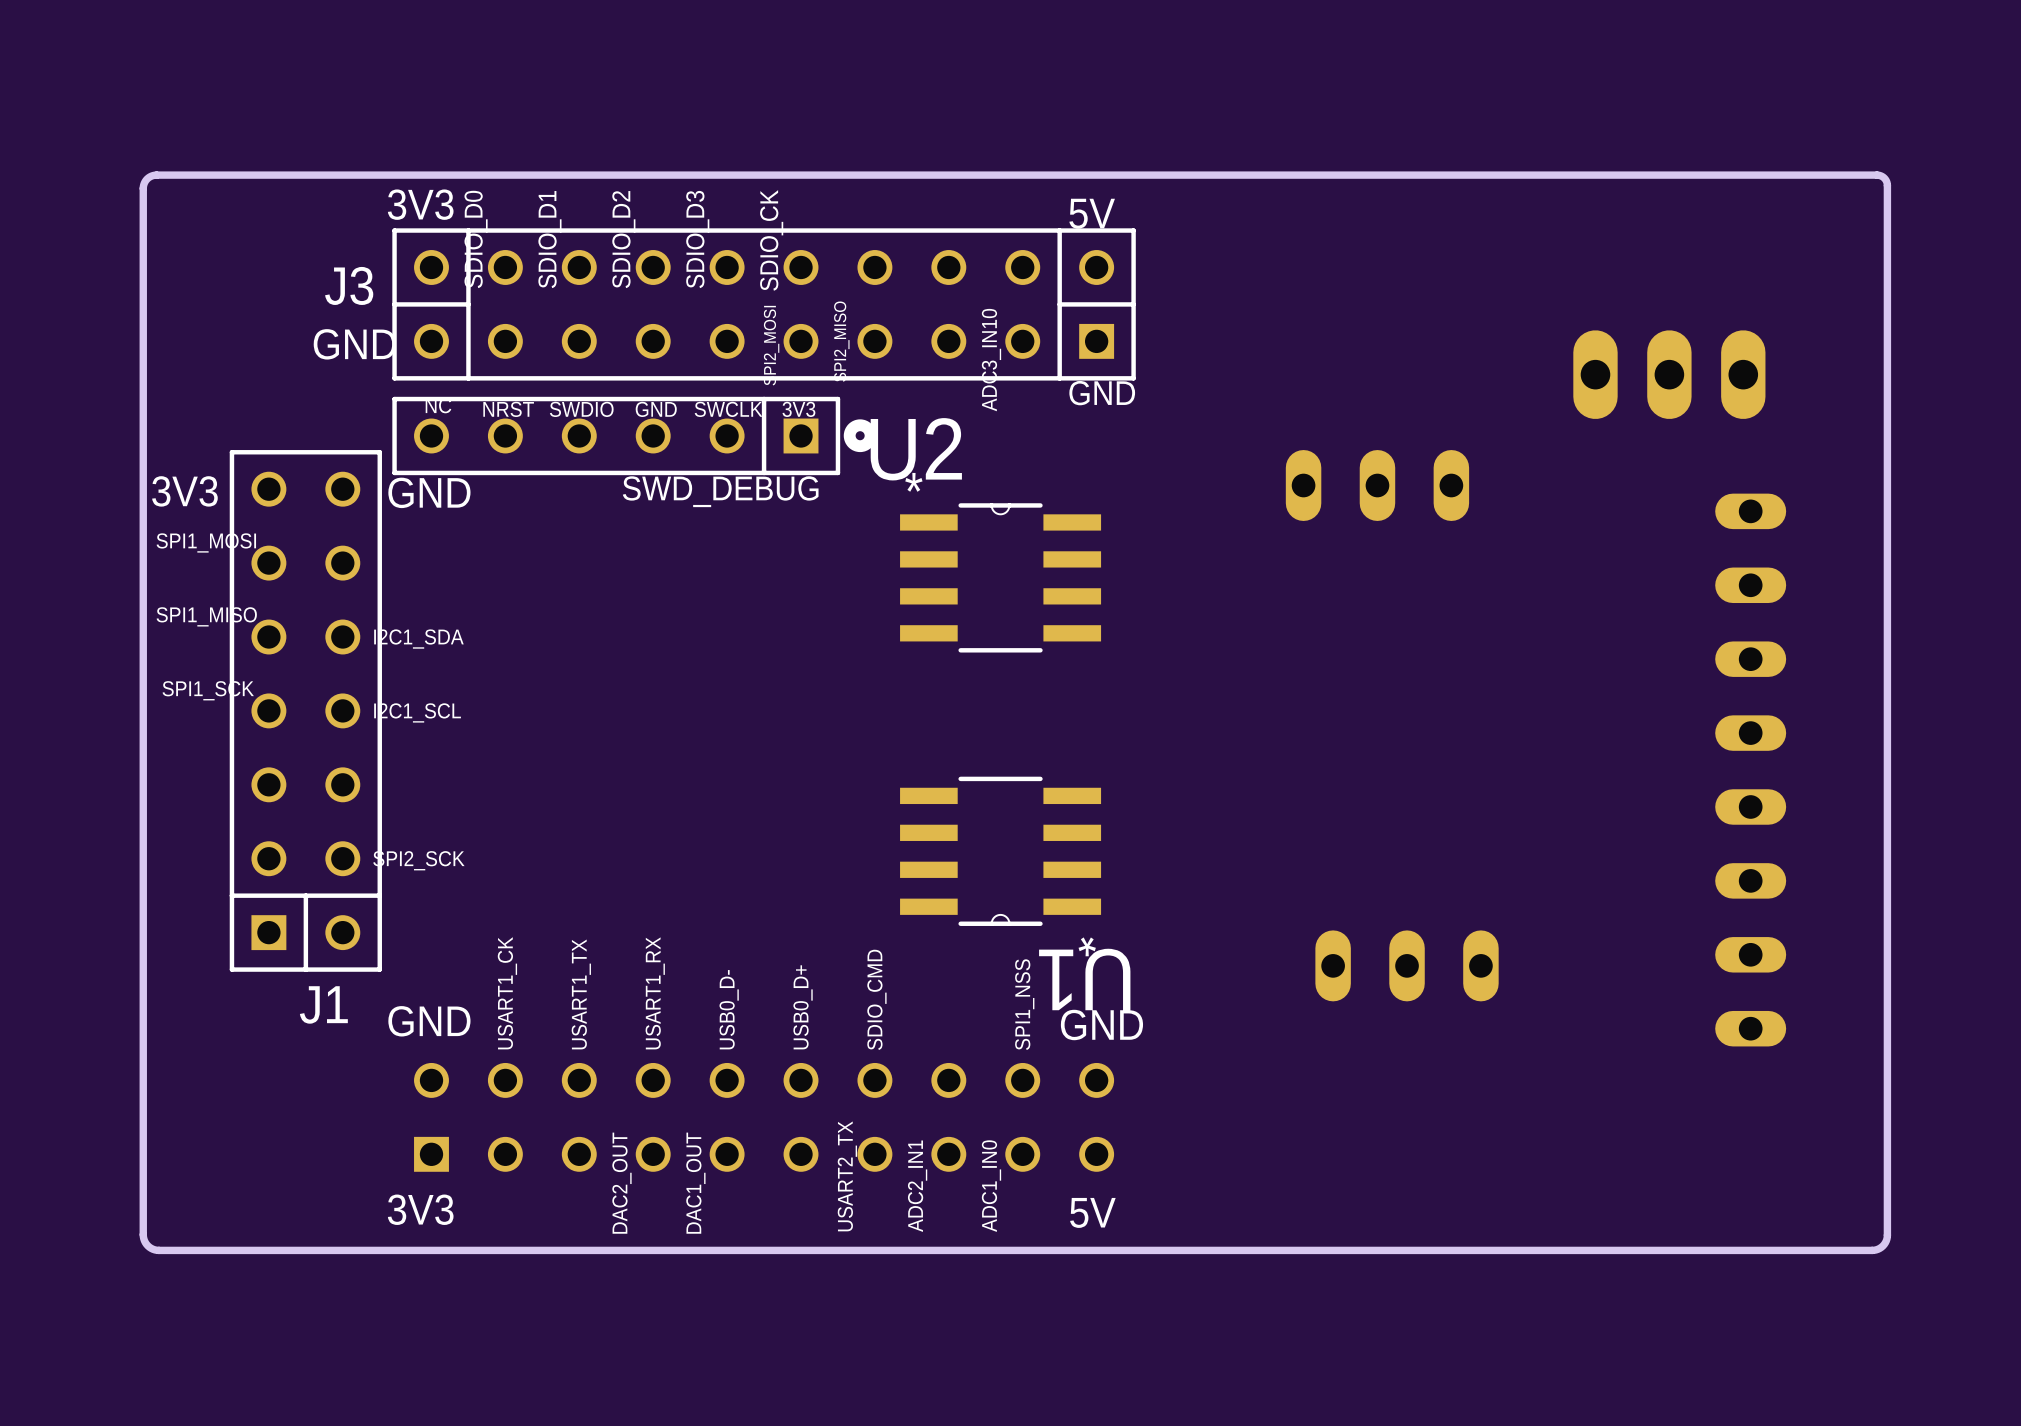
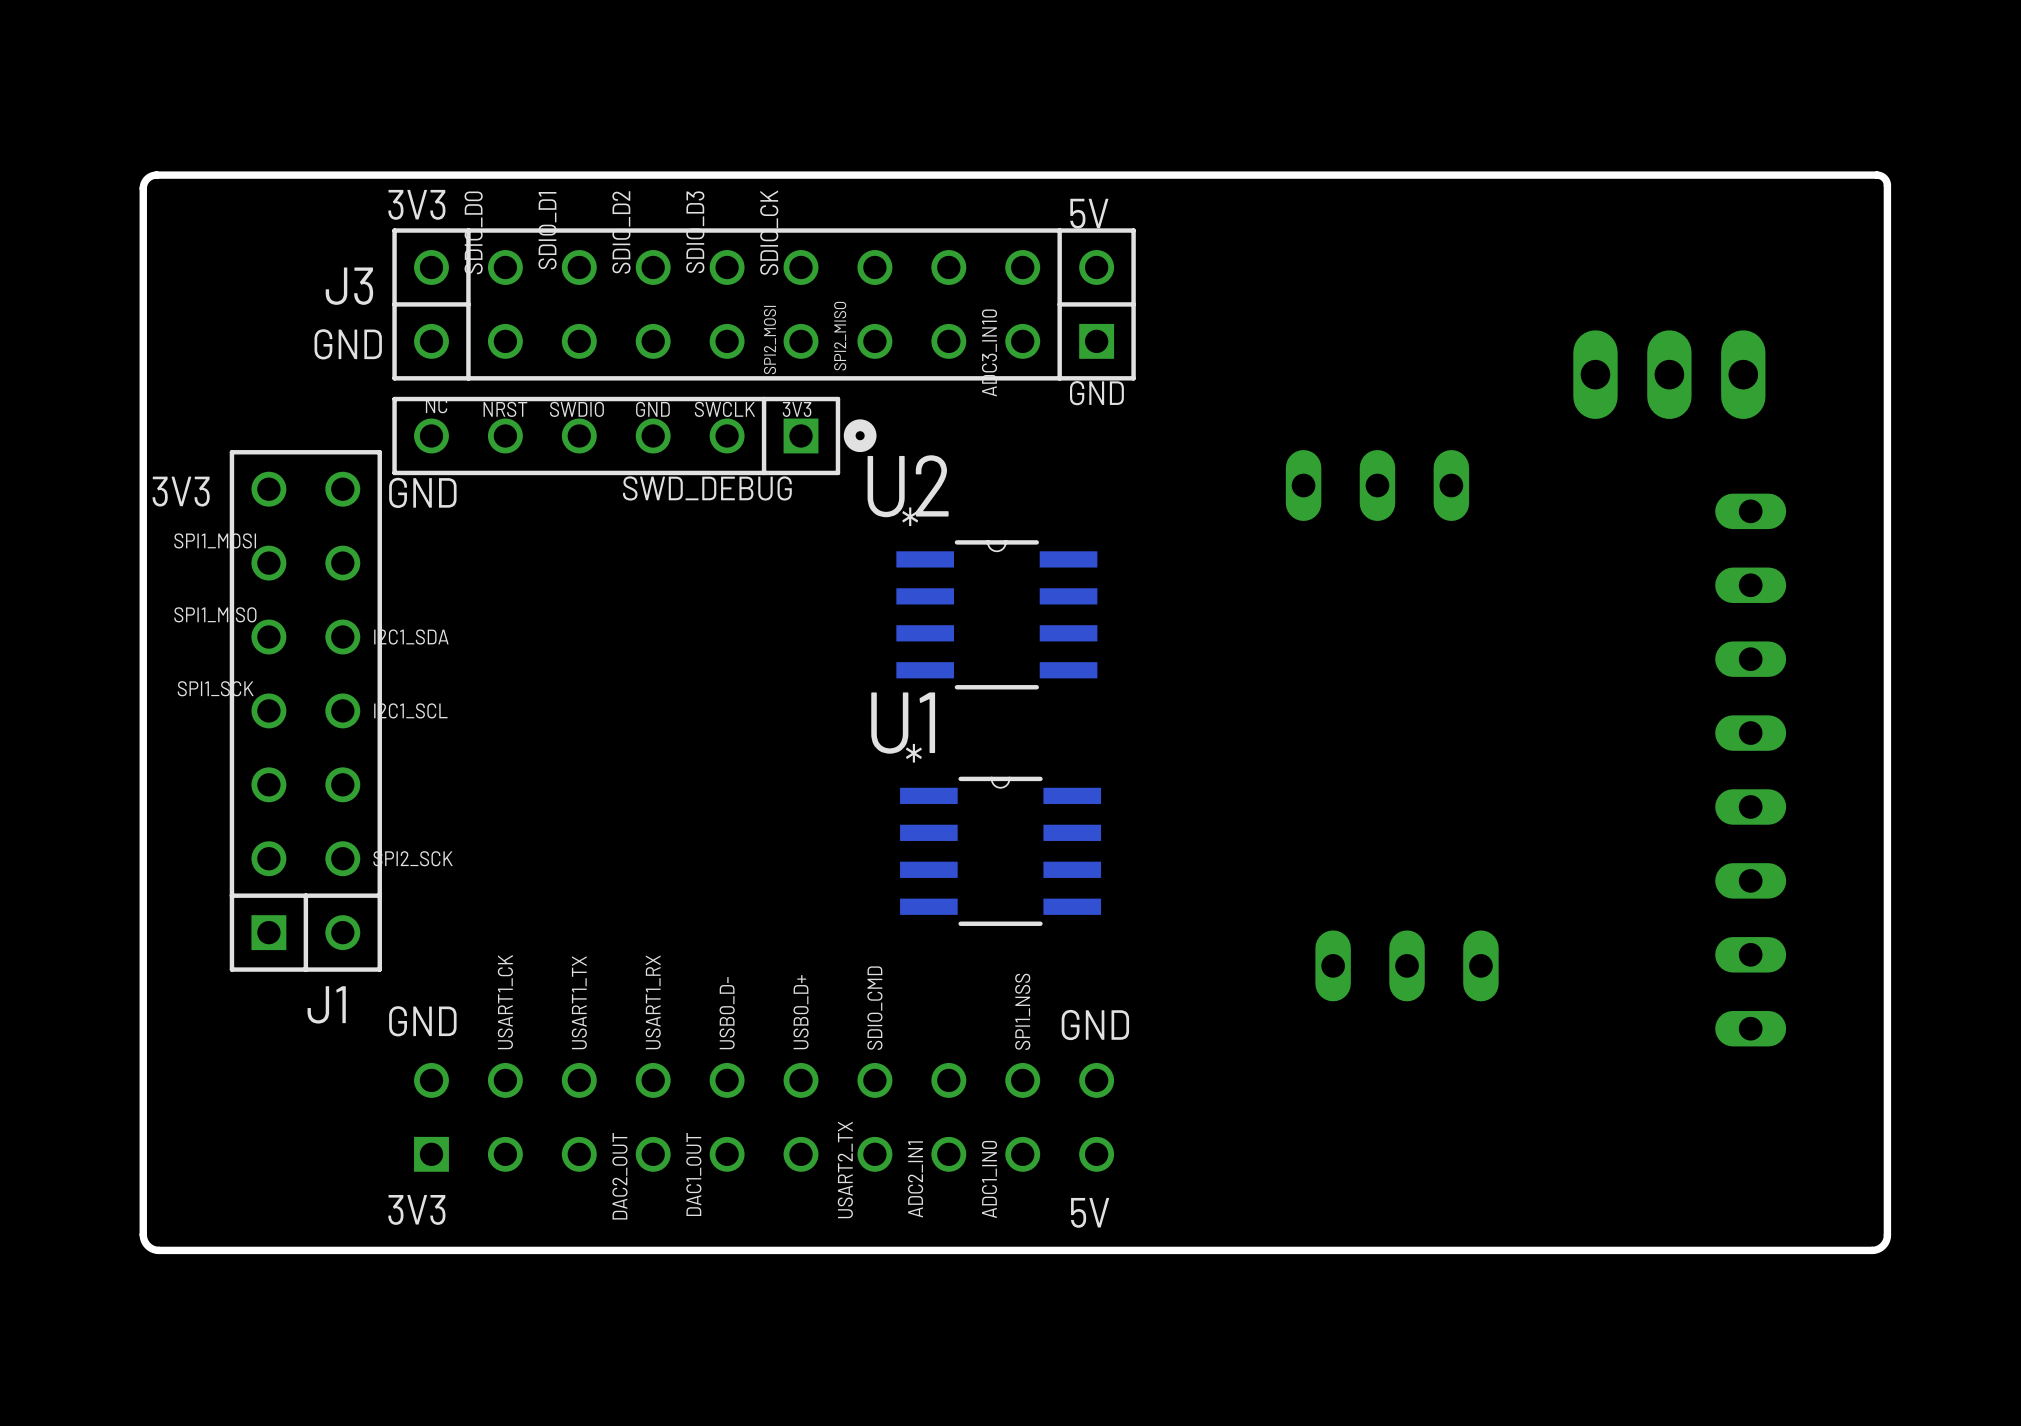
U2 position: (1000, 577) -> (996, 614)
U1 rotation: 0° (1000, 851) -> 180° (1000, 851)

